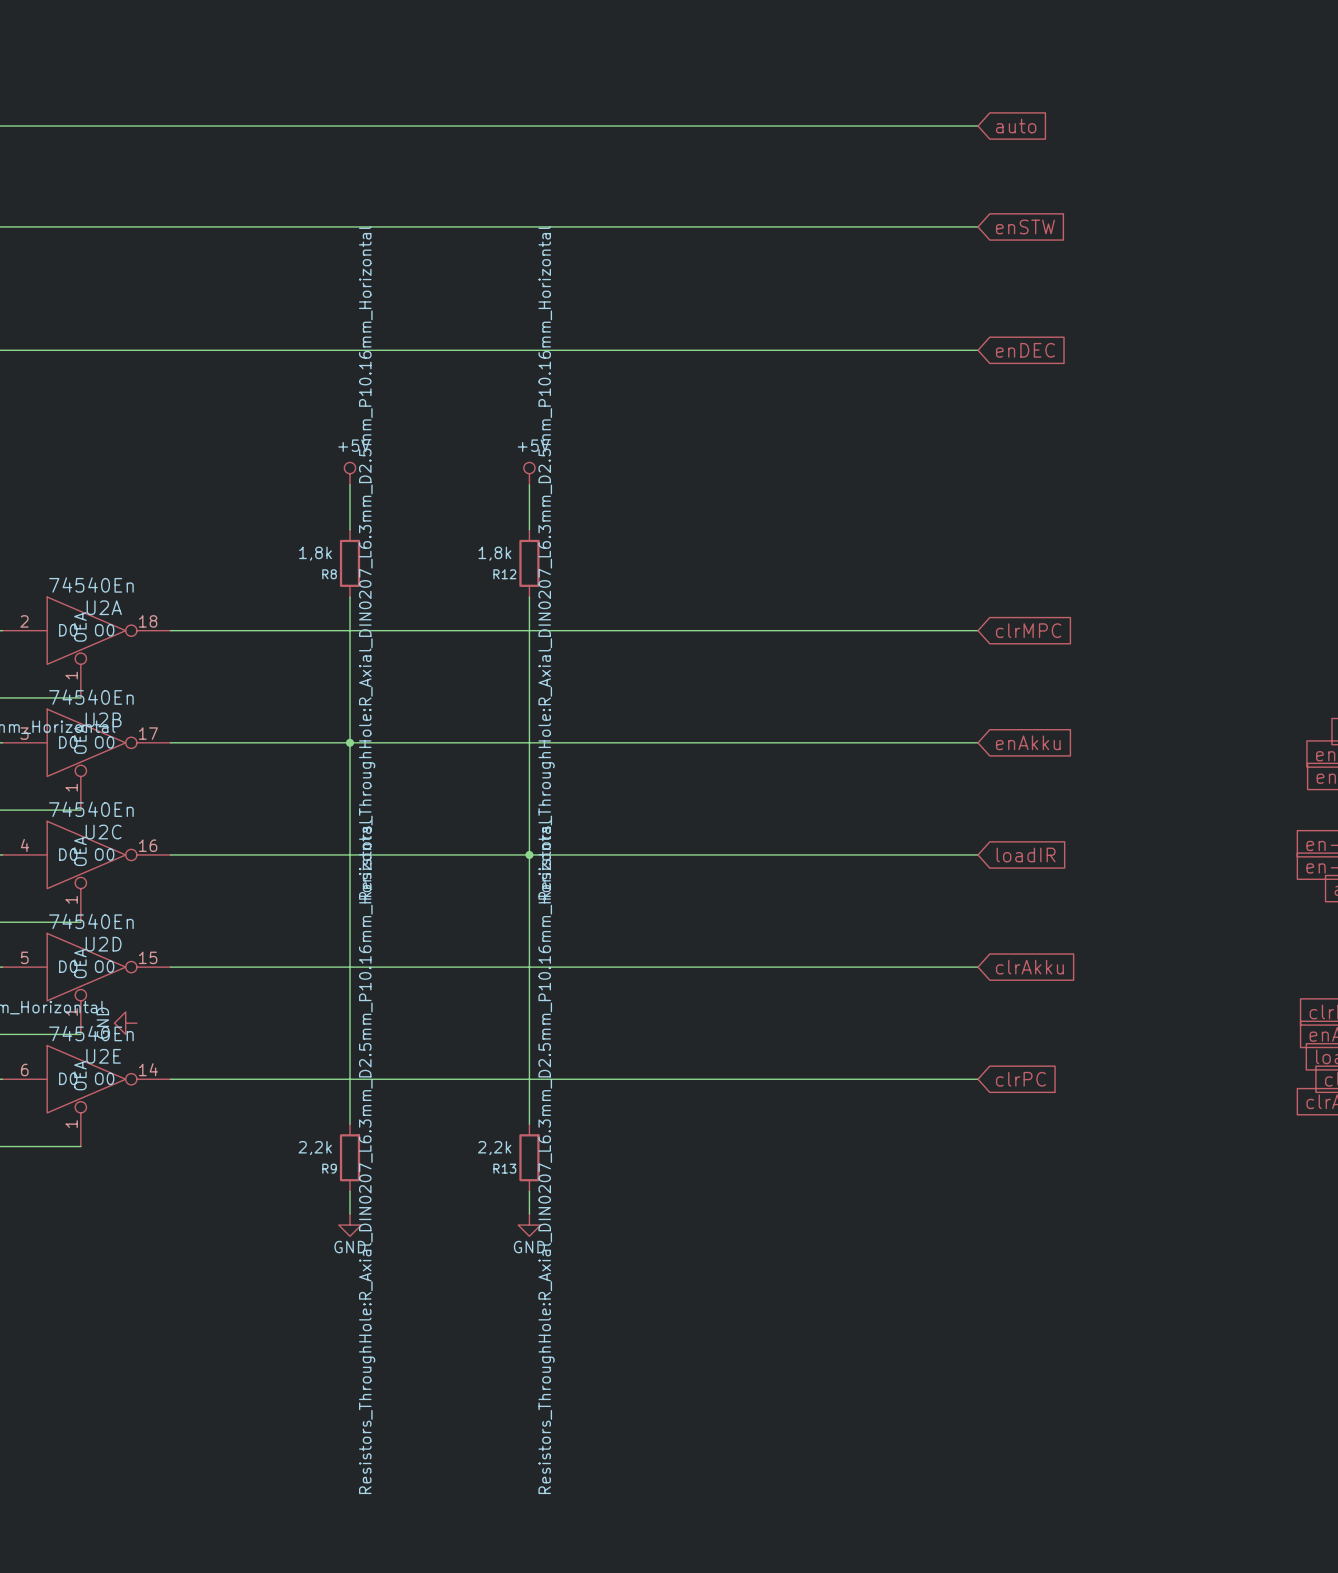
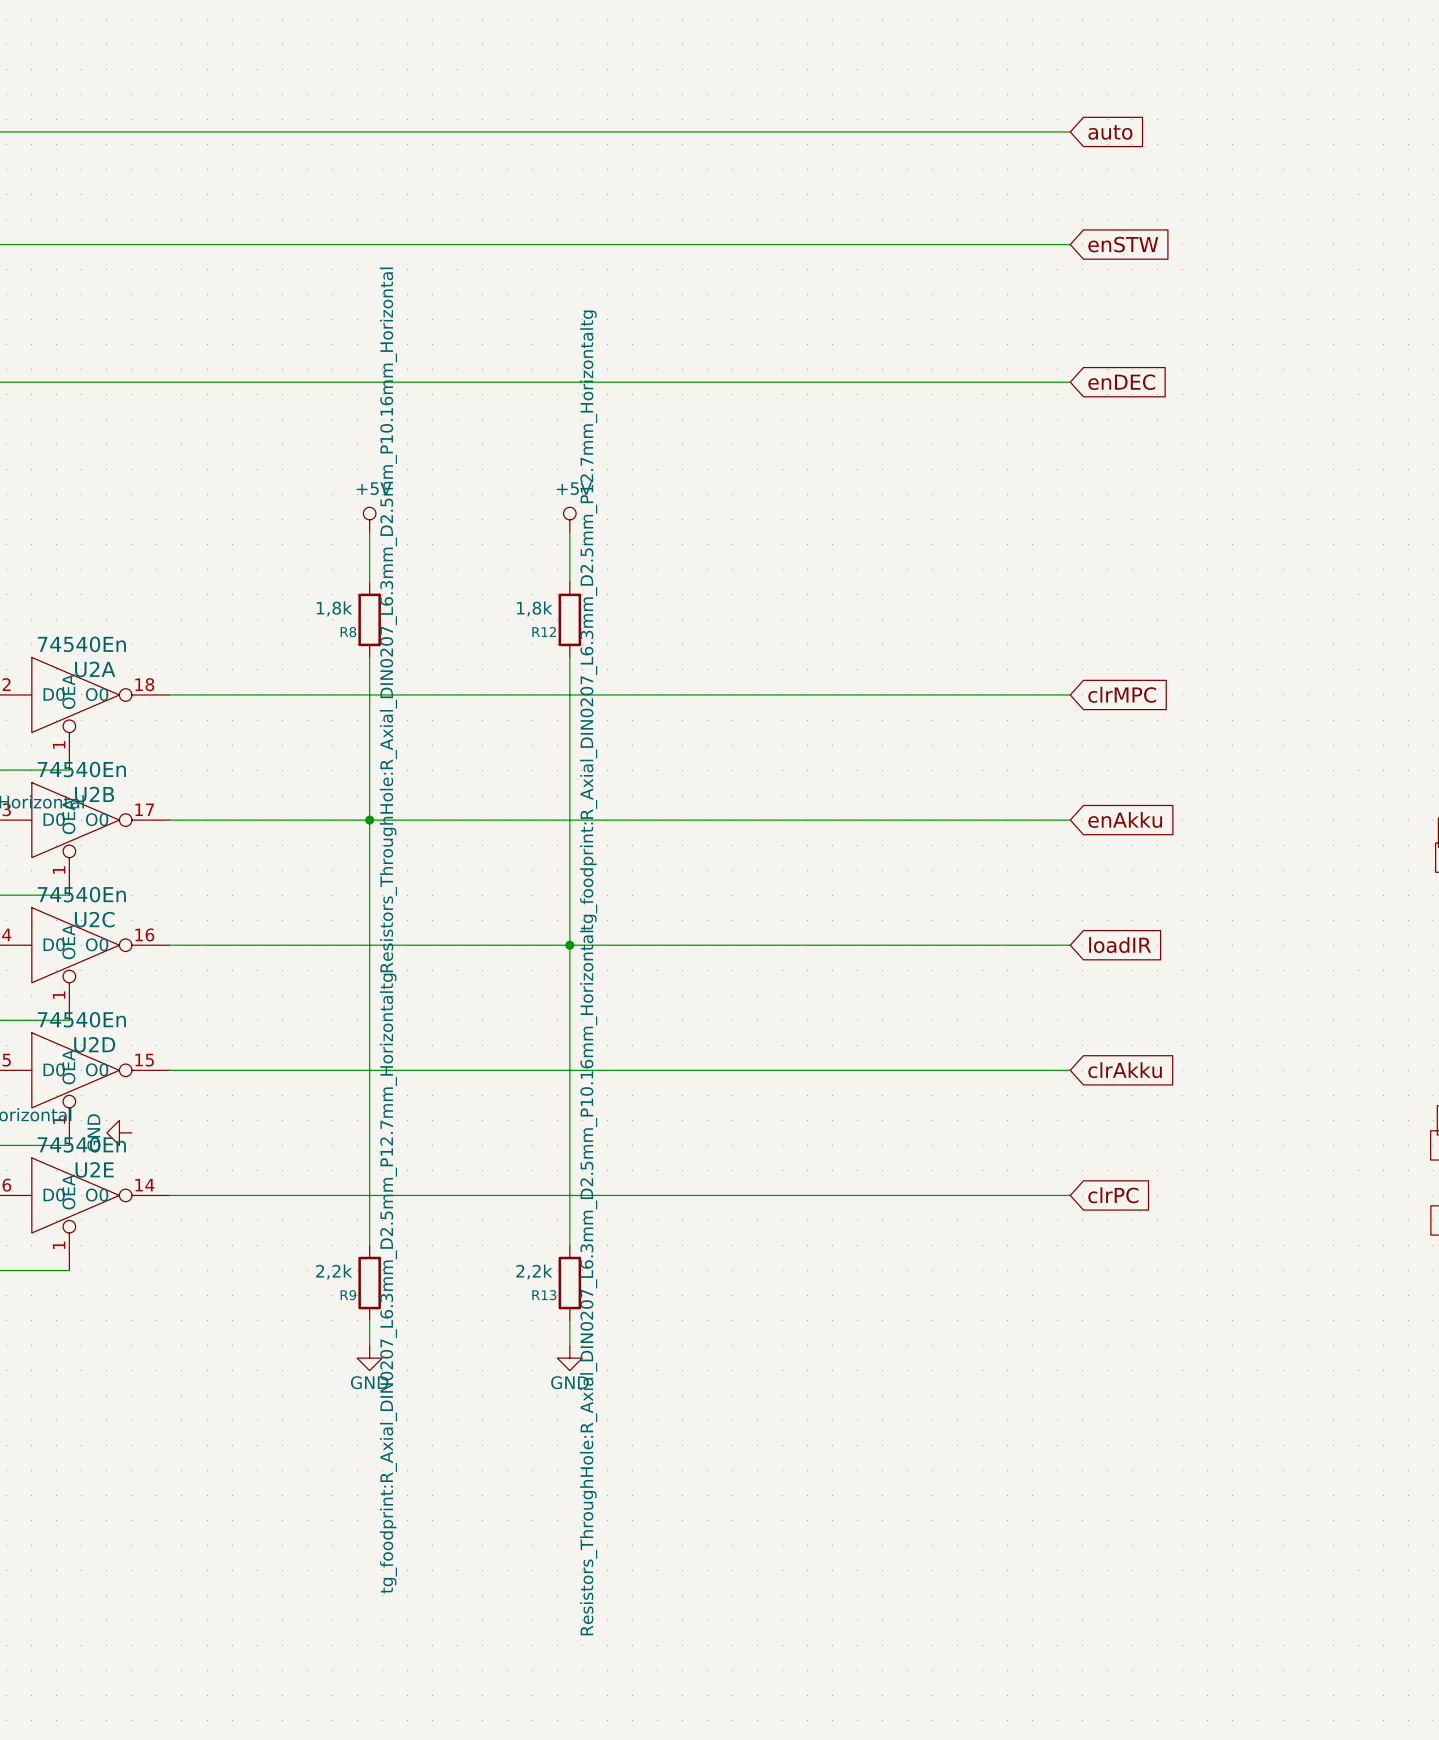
R12 text: Resistors_ThroughHole:R_Axial_DIN0207_L6.3mm_D2.5mm_P10.16mm_Horizontal (546, 562) -> tg_foodprint:R_Axial_DIN0207_L6.3mm_D2.5mm_P12.7mm_Horizontaltg (588, 620)
R9 text: Resistors_ThroughHole:R_Axial_DIN0207_L6.3mm_D2.5mm_P10.16mm_Horizontal (367, 1157) -> tg_foodprint:R_Axial_DIN0207_L6.3mm_D2.5mm_P12.7mm_Horizontaltg (388, 1283)

